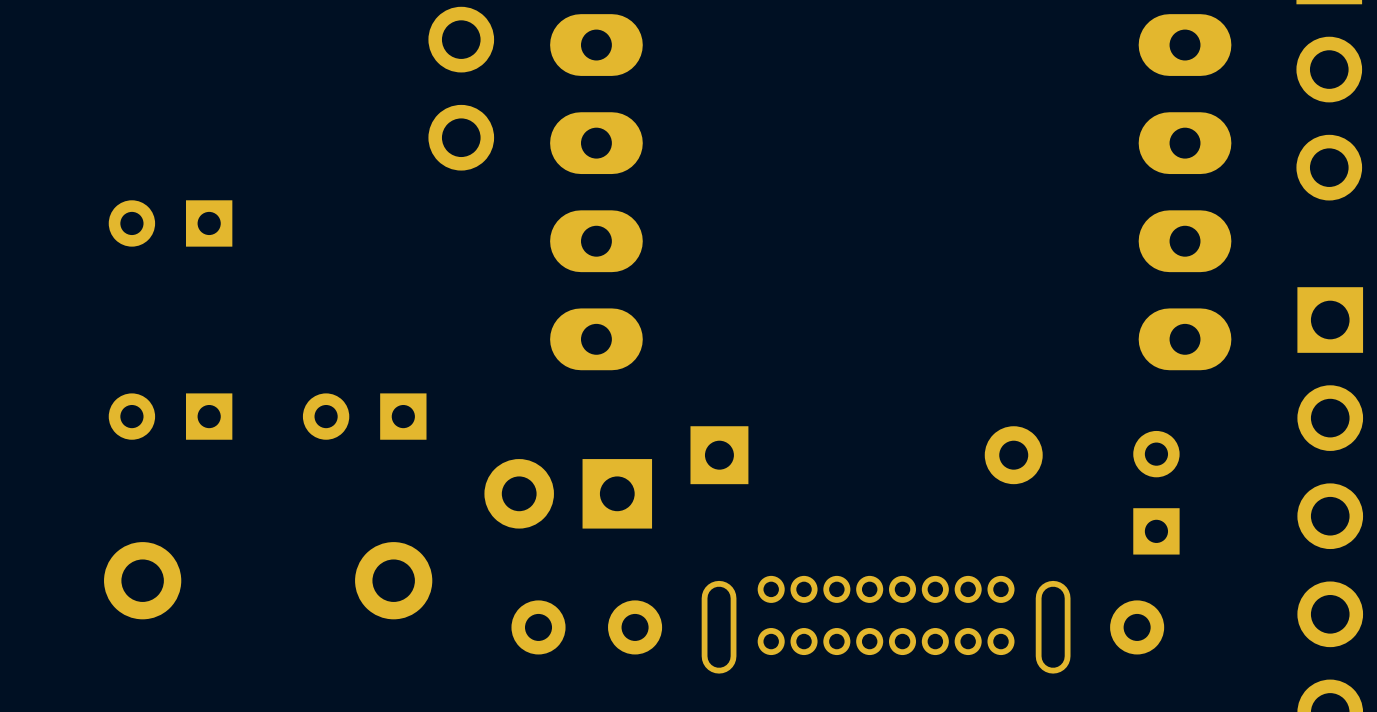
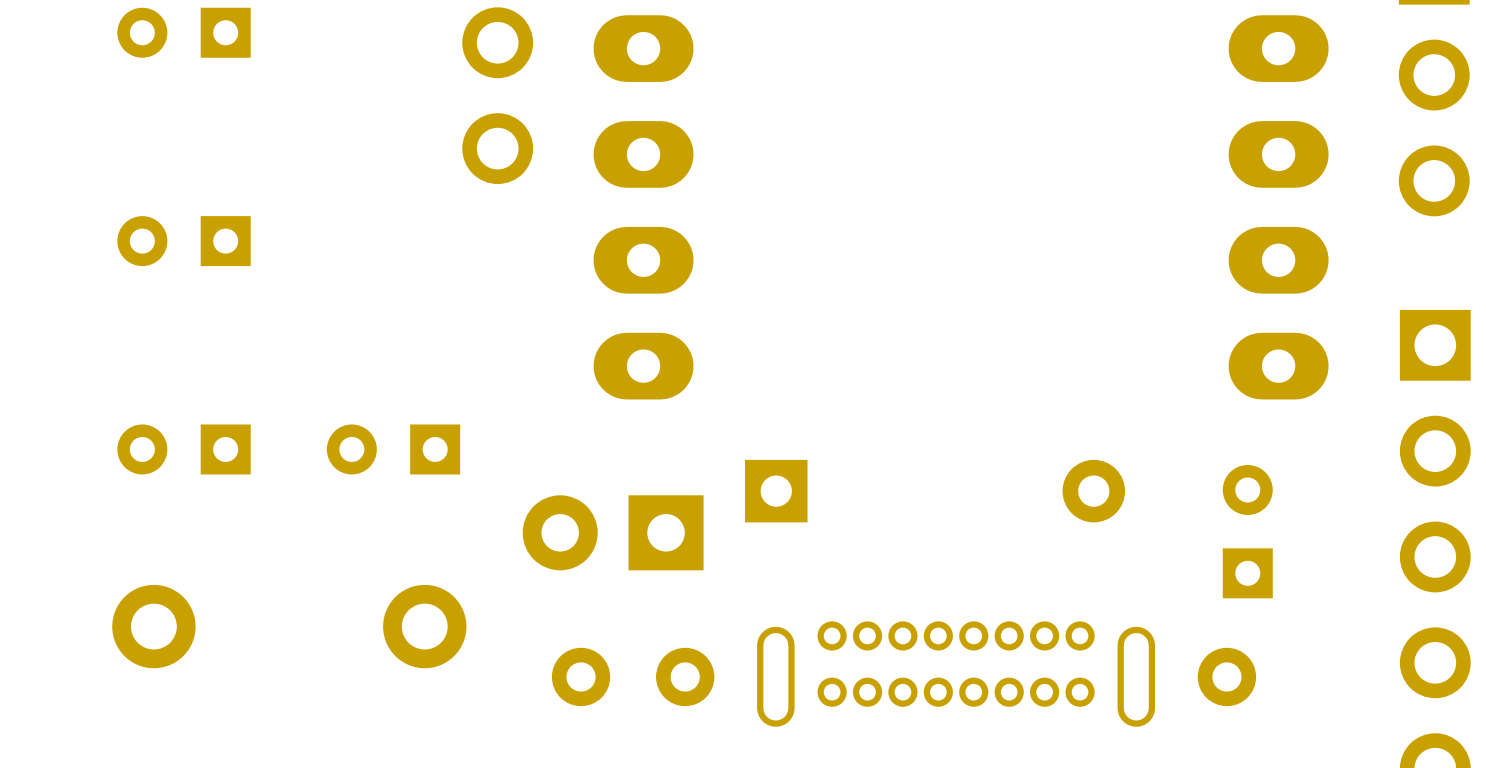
part: none -> (184, 32)

